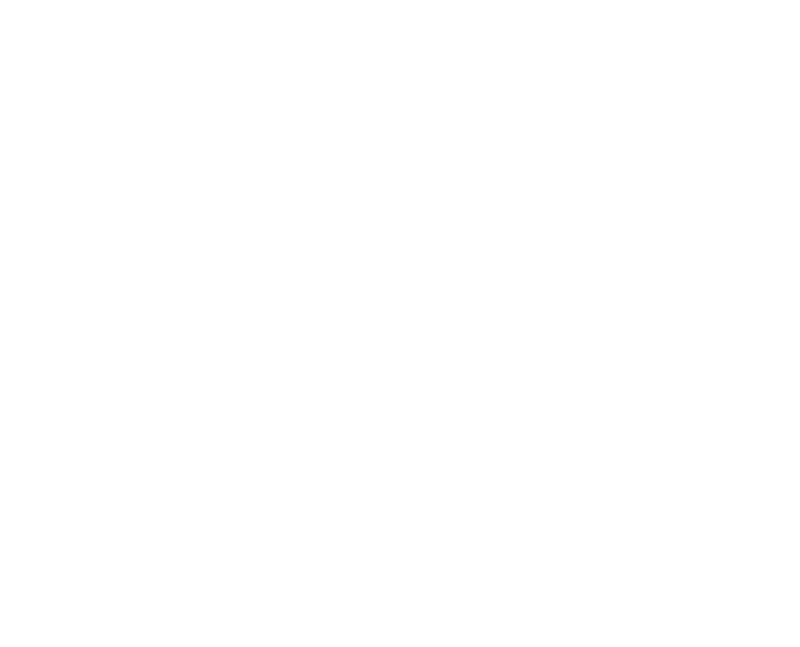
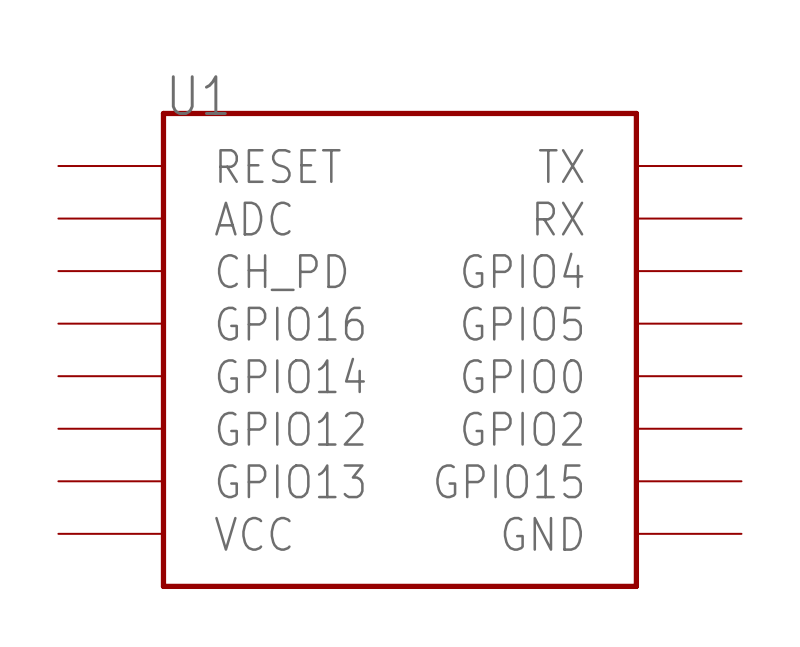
U1: none -> (399, 349)

